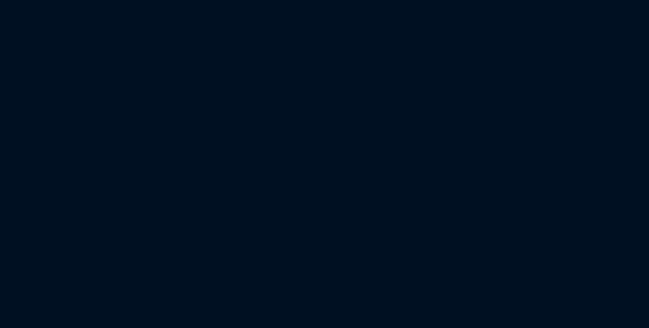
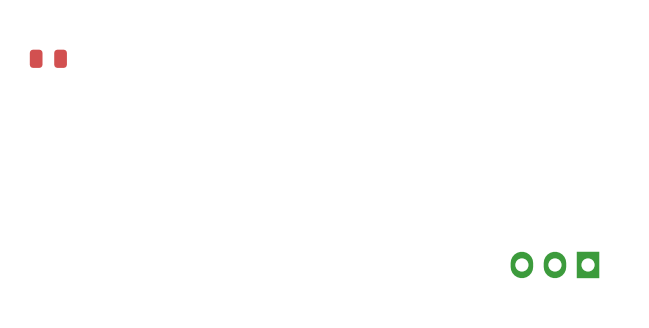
part: none -> (48, 58)
part: none -> (554, 264)

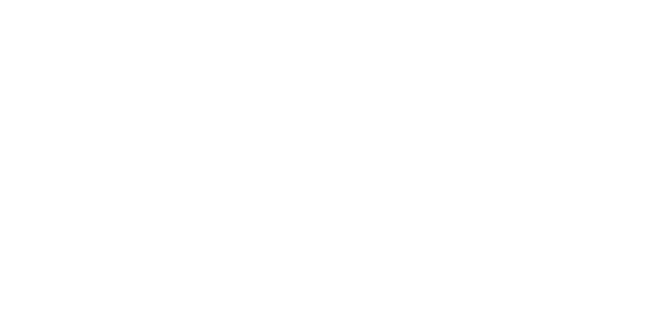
part: (48, 58) -> none
part: (554, 264) -> none

